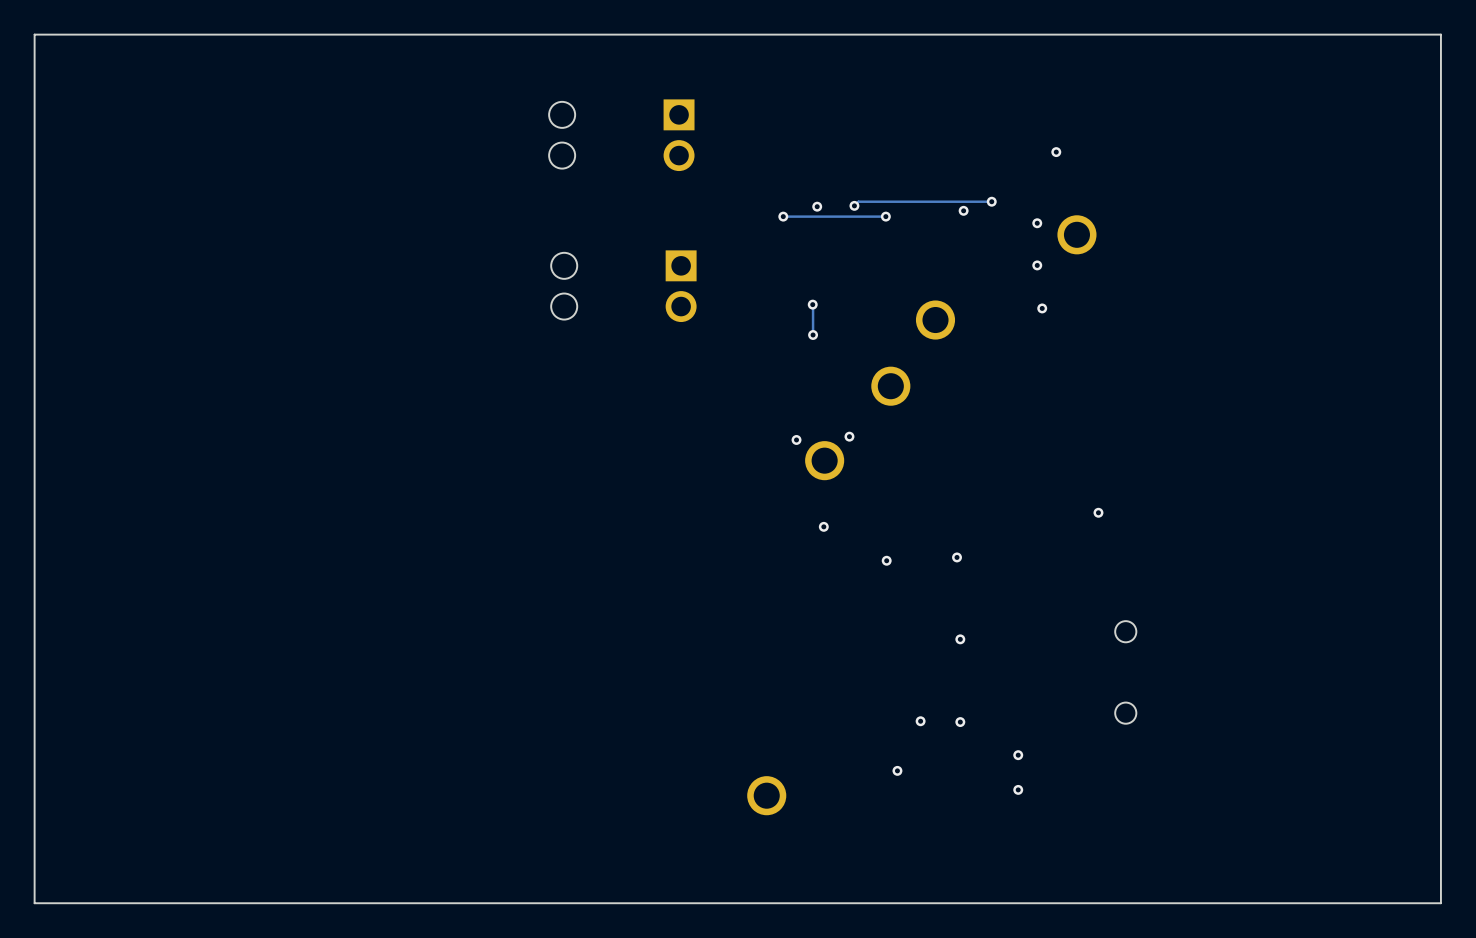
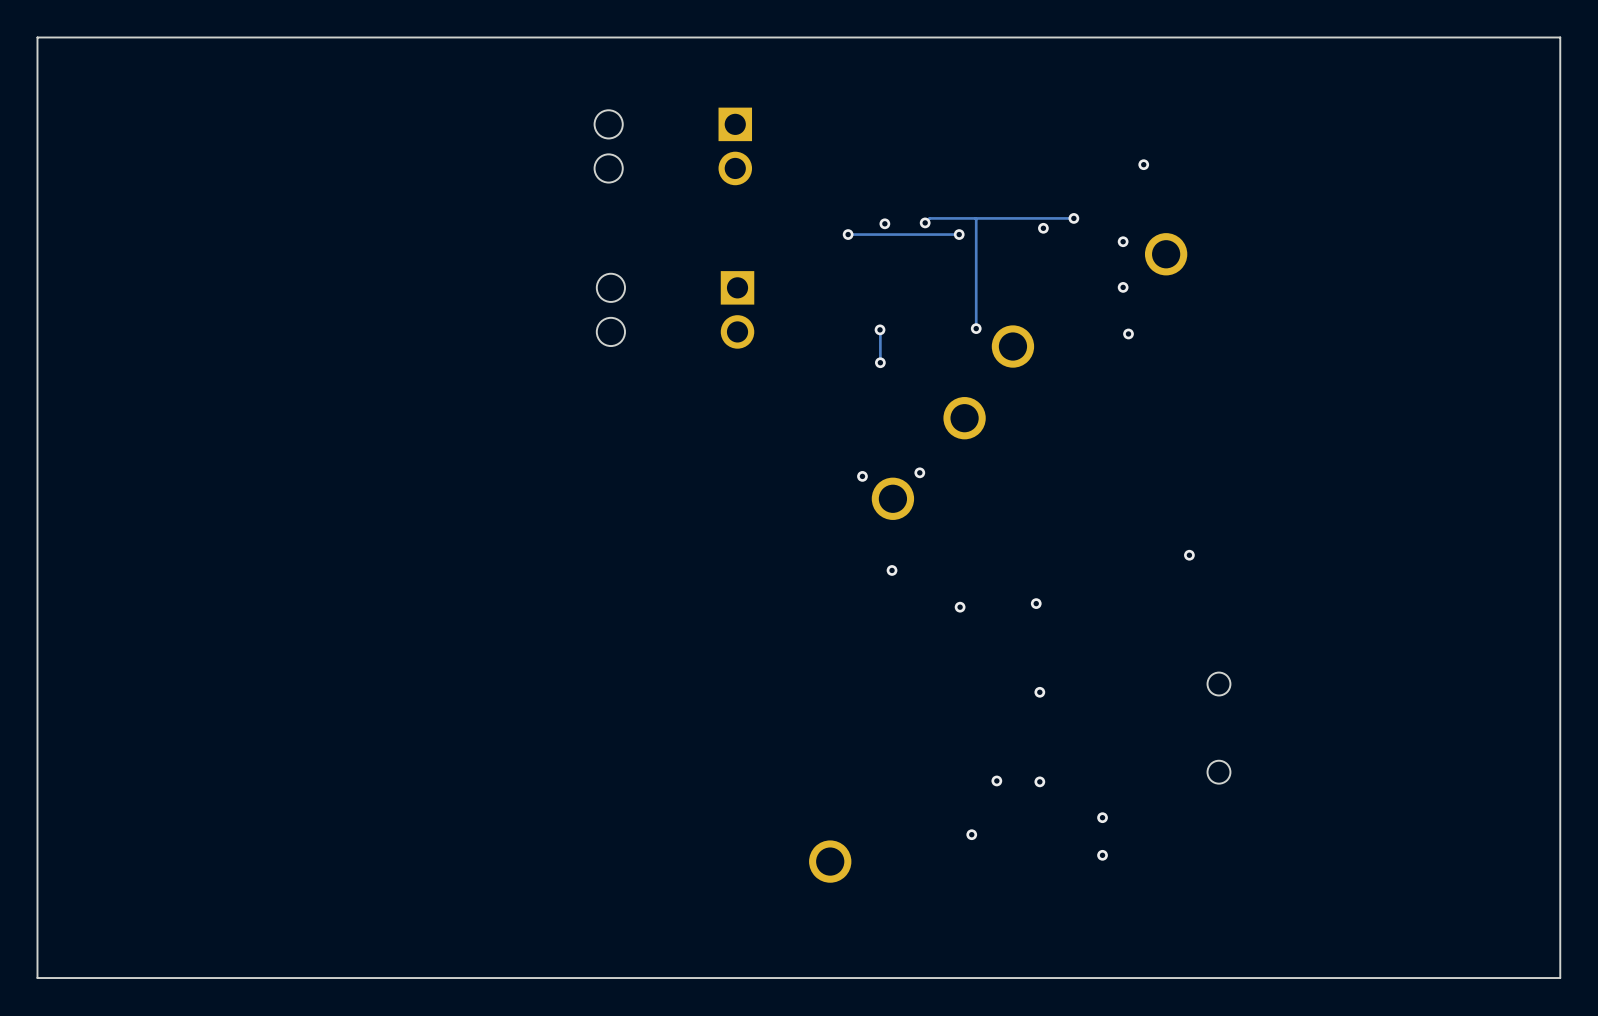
track: none -> (975, 218) (976, 328)
via: none -> (976, 328)

